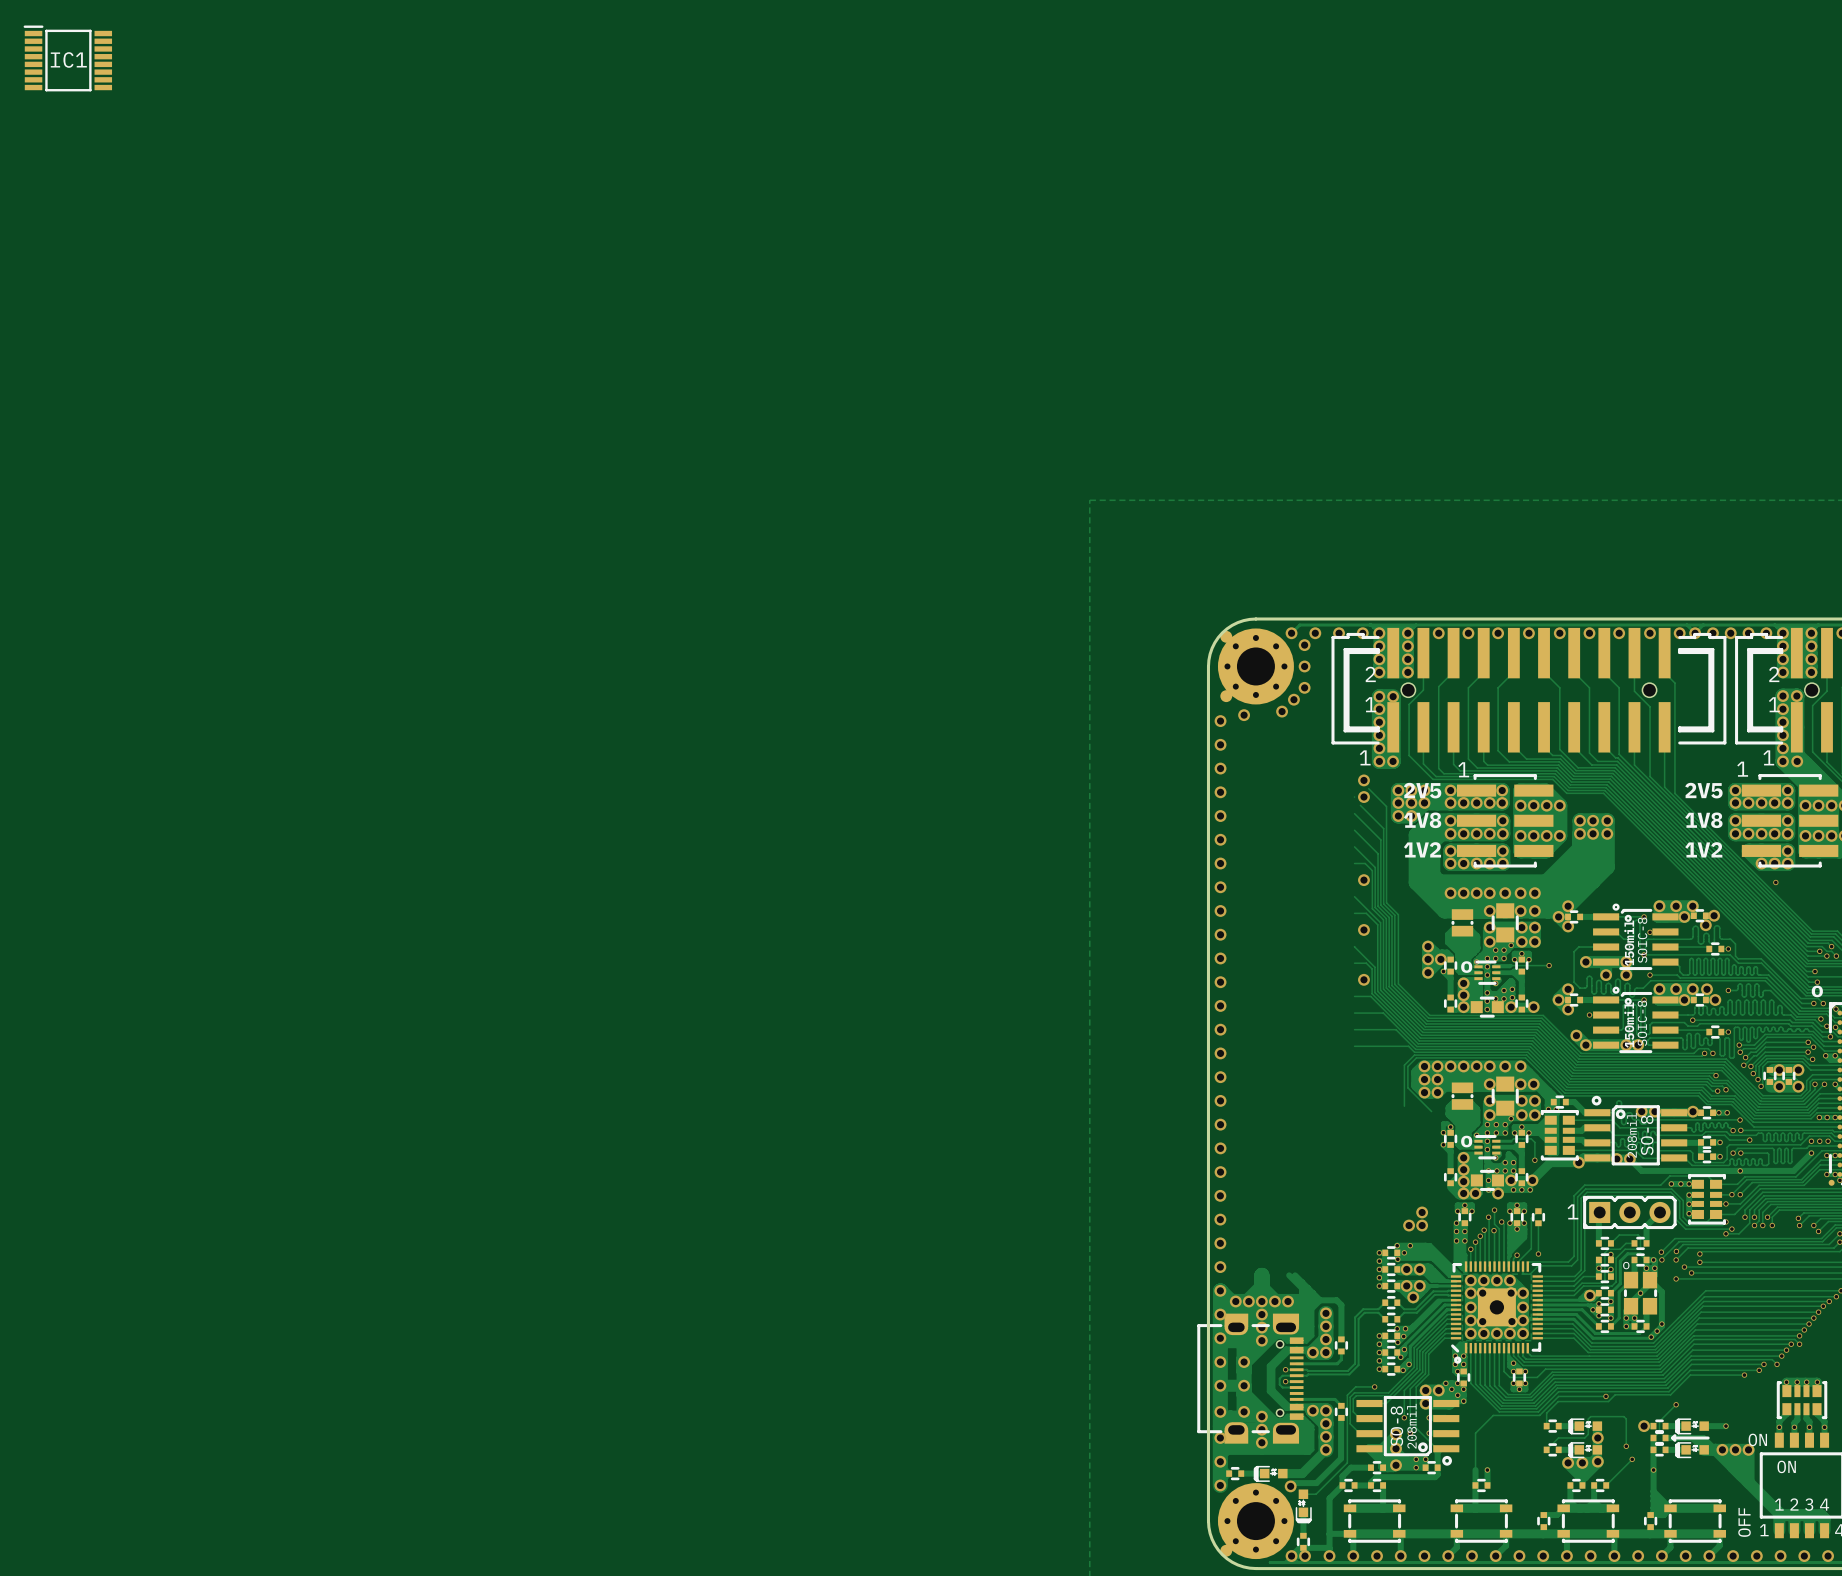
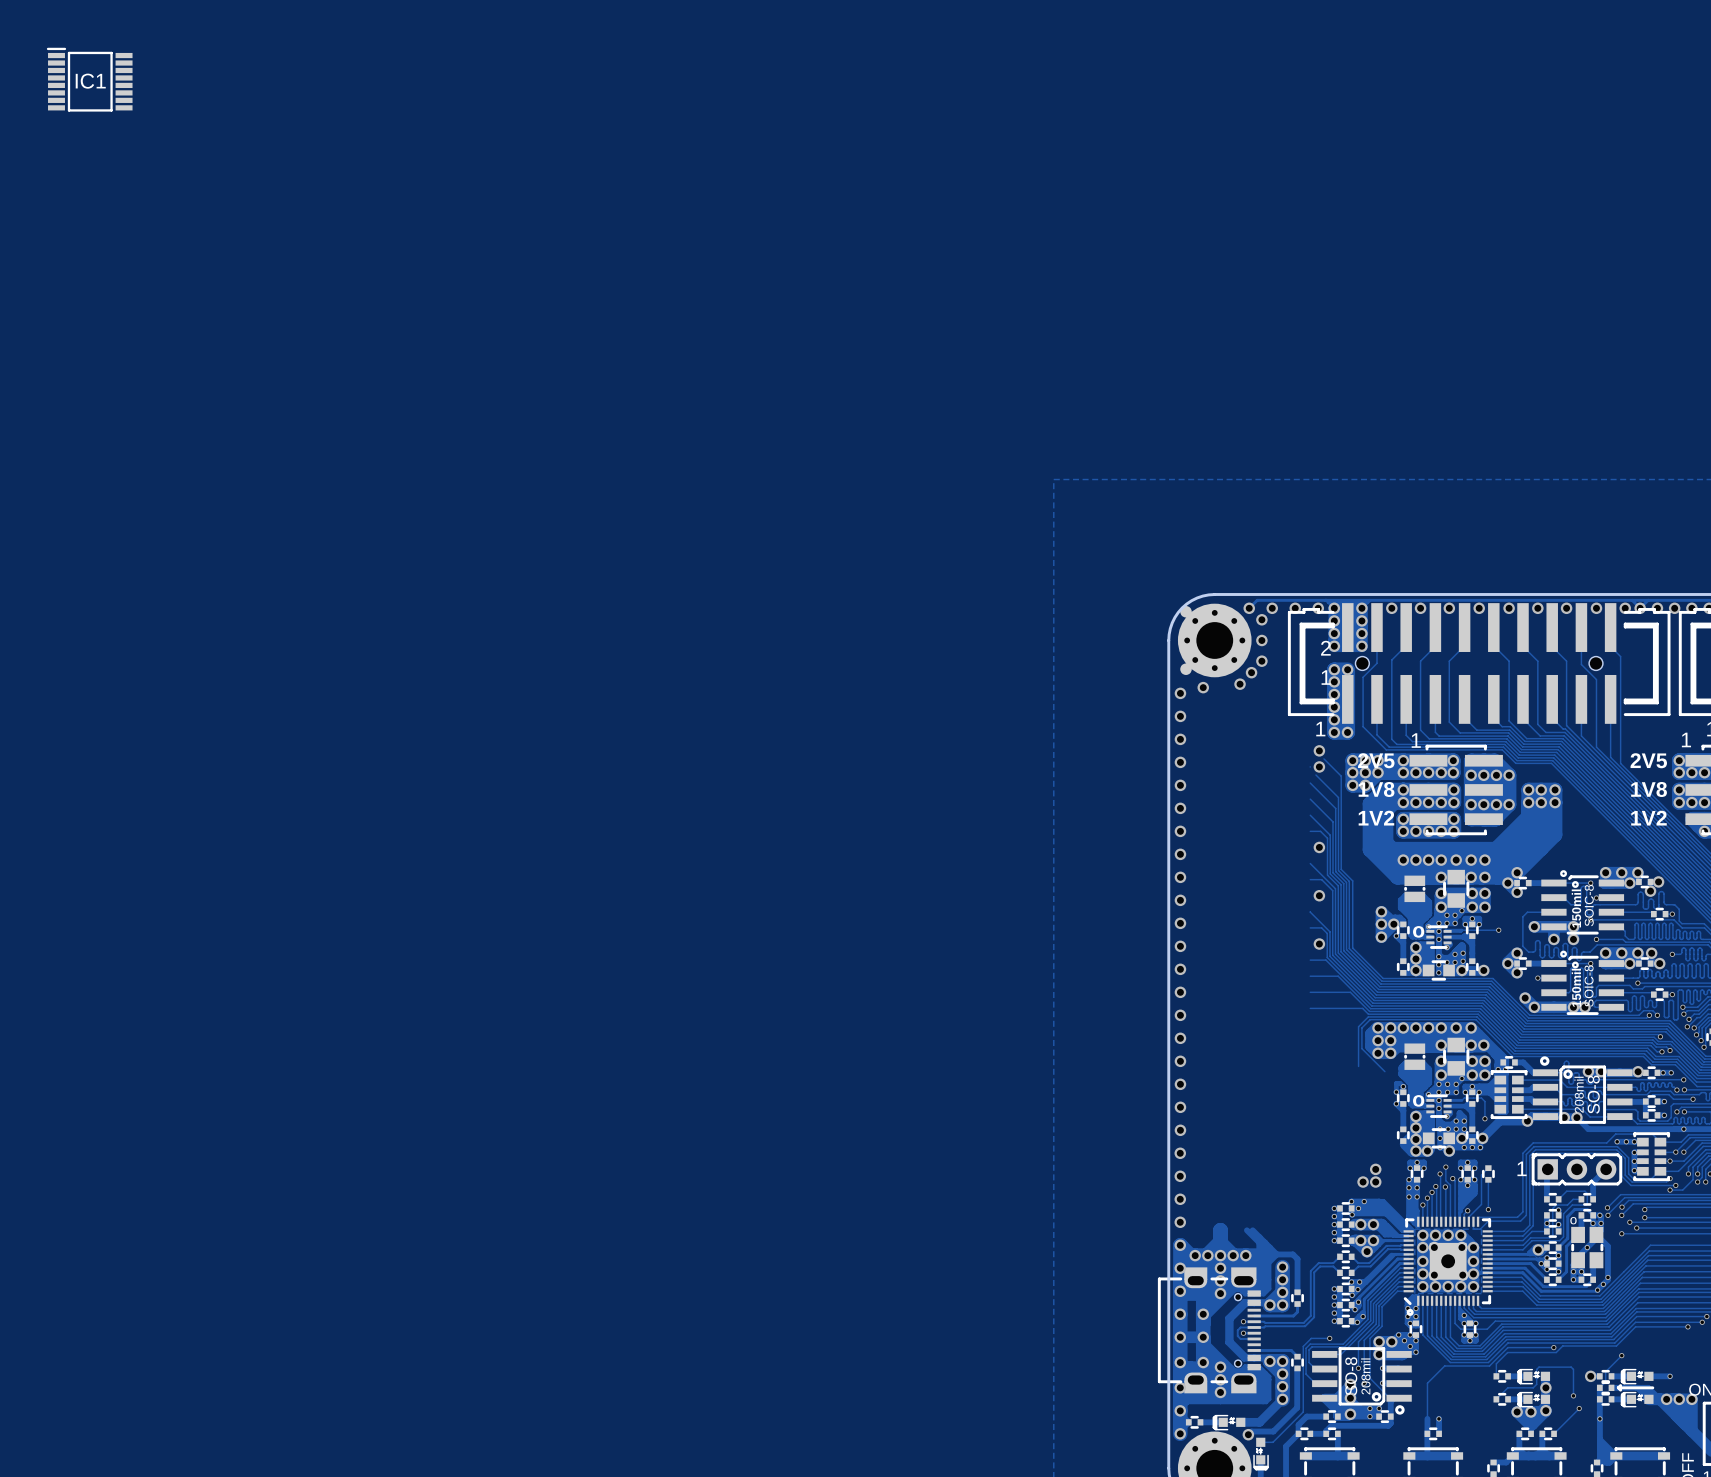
IC1 position: (67, 58) -> (89, 79)

